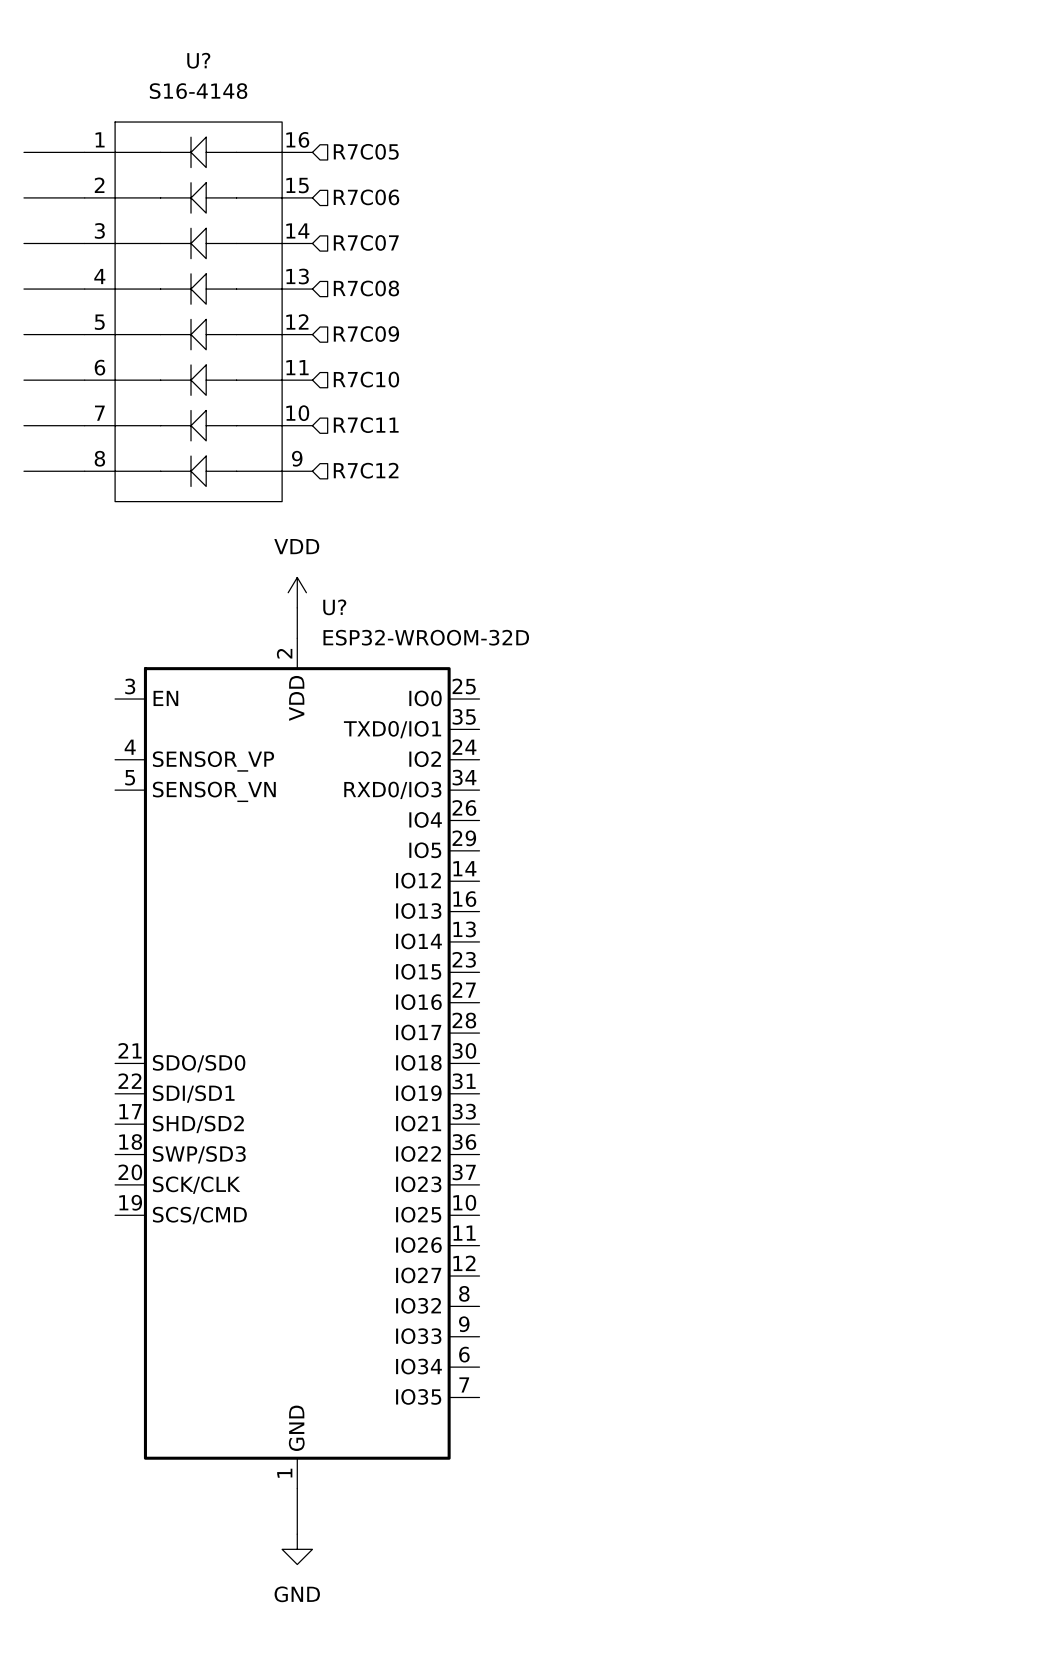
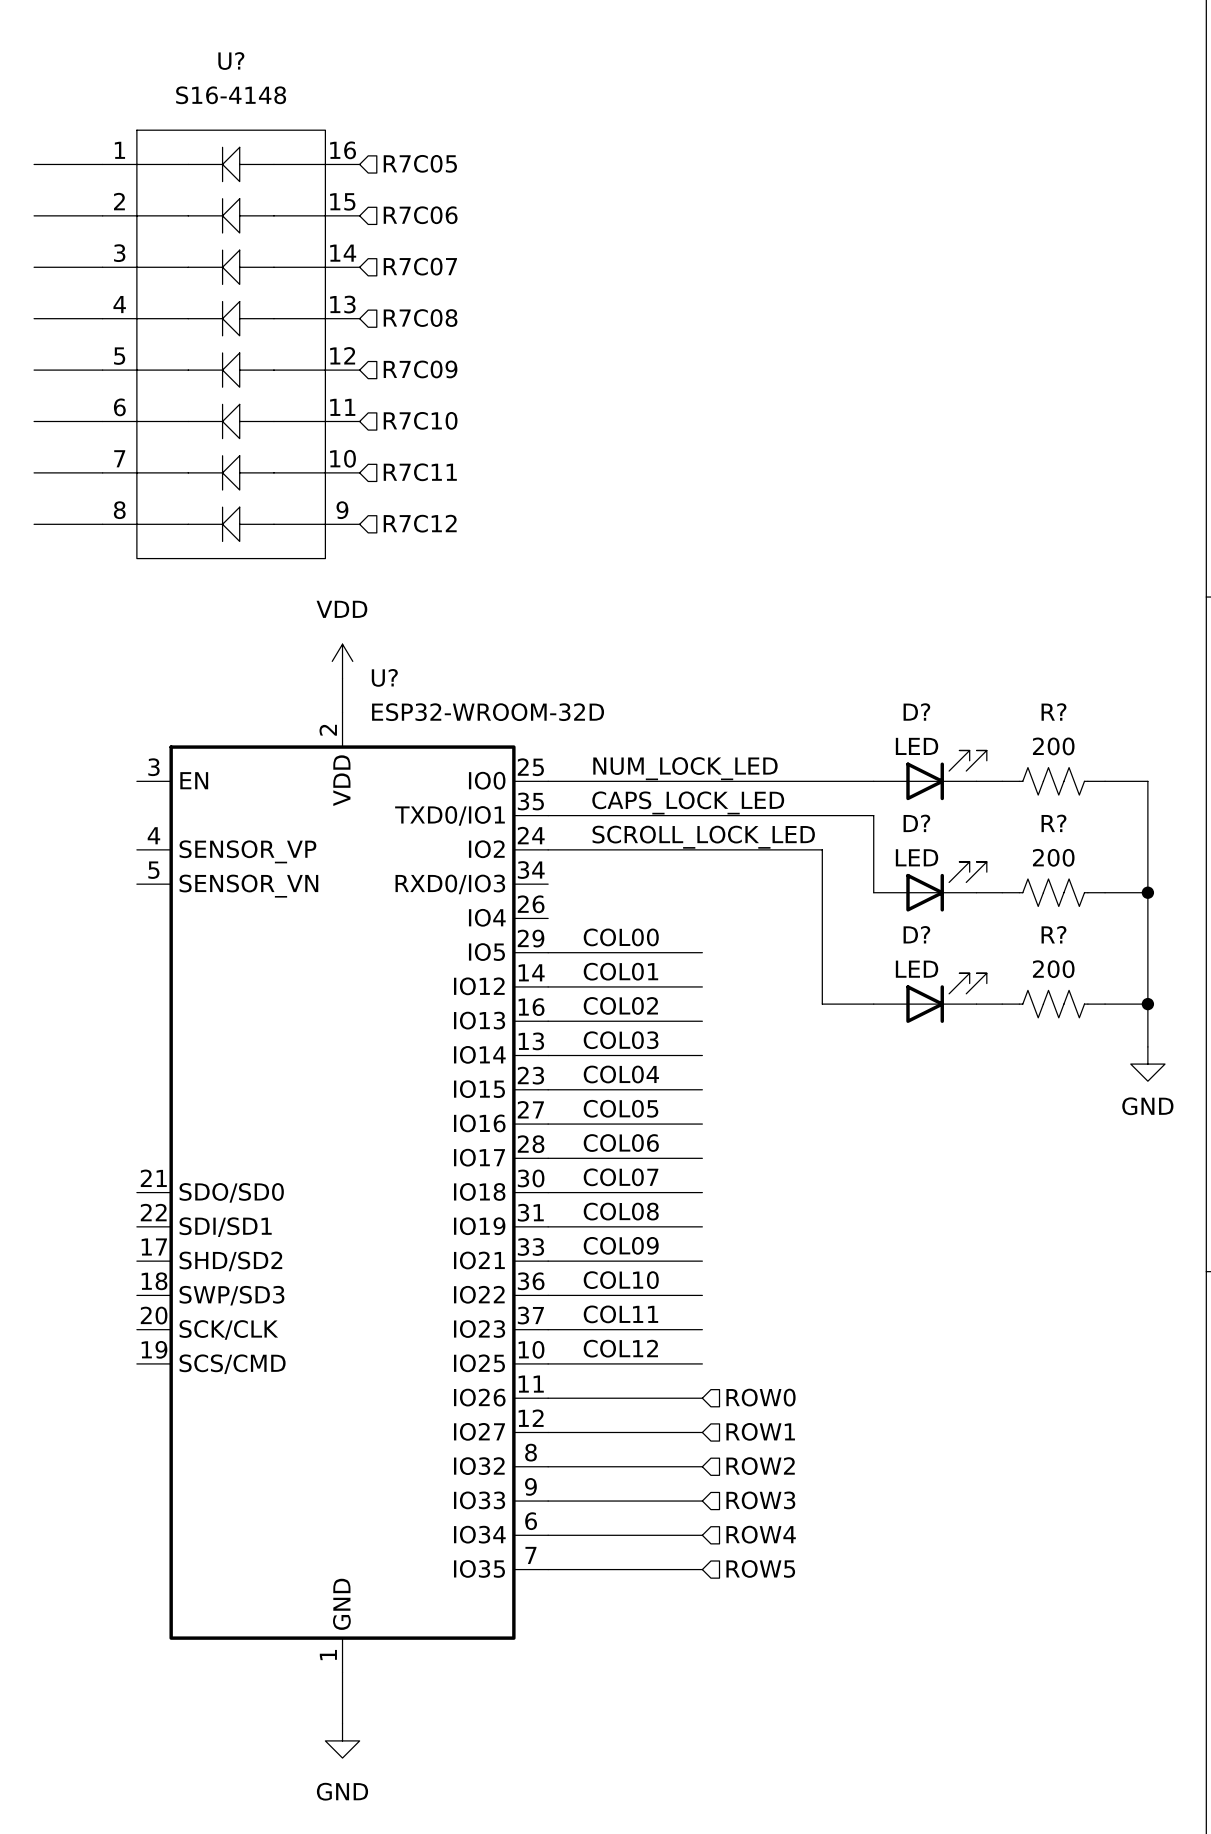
label: none -> NUM_LOCK_LED (685, 768)
D?: none -> LED (930, 775)
wire: none -> (548, 781) (873, 781)
wire: none -> (976, 781) (1002, 781)
R?: none -> 200 (1053, 781)
wire: none -> (1105, 781) (1147, 781) (1147, 1046)
label: none -> CAPS_LOCK_LED (688, 802)
wire: none -> (548, 815) (873, 815) (873, 892)
label: none -> SCROLL_LOCK_LED (703, 837)
wire: none -> (548, 849) (822, 849) (822, 1004) (873, 1004)
D?: none -> LED (930, 886)
wire: none -> (976, 892) (1002, 892)
R?: none -> 200 (1053, 892)
wire: none -> (1105, 892) (1147, 892)
junction: none -> (1147, 892)
label: none -> COL00 (621, 937)
wire: none -> (548, 952) (702, 952)
label: none -> COL01 (620, 971)
wire: none -> (548, 986) (702, 986)
D?: none -> LED (930, 998)
wire: none -> (976, 1004) (1002, 1004)
R?: none -> 200 (1053, 1004)
wire: none -> (1105, 1004) (1147, 1004)
junction: none -> (1147, 1004)
label: none -> COL02 (620, 1005)
wire: none -> (548, 1021) (702, 1021)
label: none -> COL03 (621, 1040)
wire: none -> (548, 1055) (702, 1055)
power symbol: none -> GND (1147, 1064)
label: none -> COL04 (621, 1074)
wire: none -> (548, 1089) (702, 1089)
label: none -> COL05 (621, 1108)
wire: none -> (548, 1124) (702, 1124)
label: none -> COL06 (621, 1143)
wire: none -> (548, 1158) (702, 1158)
label: none -> COL07 (621, 1177)
wire: none -> (548, 1192) (702, 1192)
label: none -> COL08 (621, 1211)
wire: none -> (548, 1226) (702, 1226)
label: none -> COL09 (621, 1245)
wire: none -> (548, 1261) (702, 1261)
label: none -> COL10 (621, 1280)
wire: none -> (548, 1295) (702, 1295)
label: none -> COL11 (620, 1314)
wire: none -> (548, 1329) (702, 1329)
label: none -> COL12 (620, 1348)
wire: none -> (548, 1363) (702, 1363)
wire: none -> (548, 1398) (702, 1398)
hierarchical label: none -> ROW0 (761, 1397)
hierarchical label: none -> ROW1 (760, 1431)
wire: none -> (548, 1432) (702, 1432)
hierarchical label: none -> ROW2 (760, 1466)
wire: none -> (548, 1466) (702, 1466)
wire: none -> (548, 1501) (702, 1501)
hierarchical label: none -> ROW3 (760, 1500)
hierarchical label: none -> ROW4 (761, 1534)
wire: none -> (548, 1535) (702, 1535)
hierarchical label: none -> ROW5 (760, 1568)
wire: none -> (548, 1569) (702, 1569)

